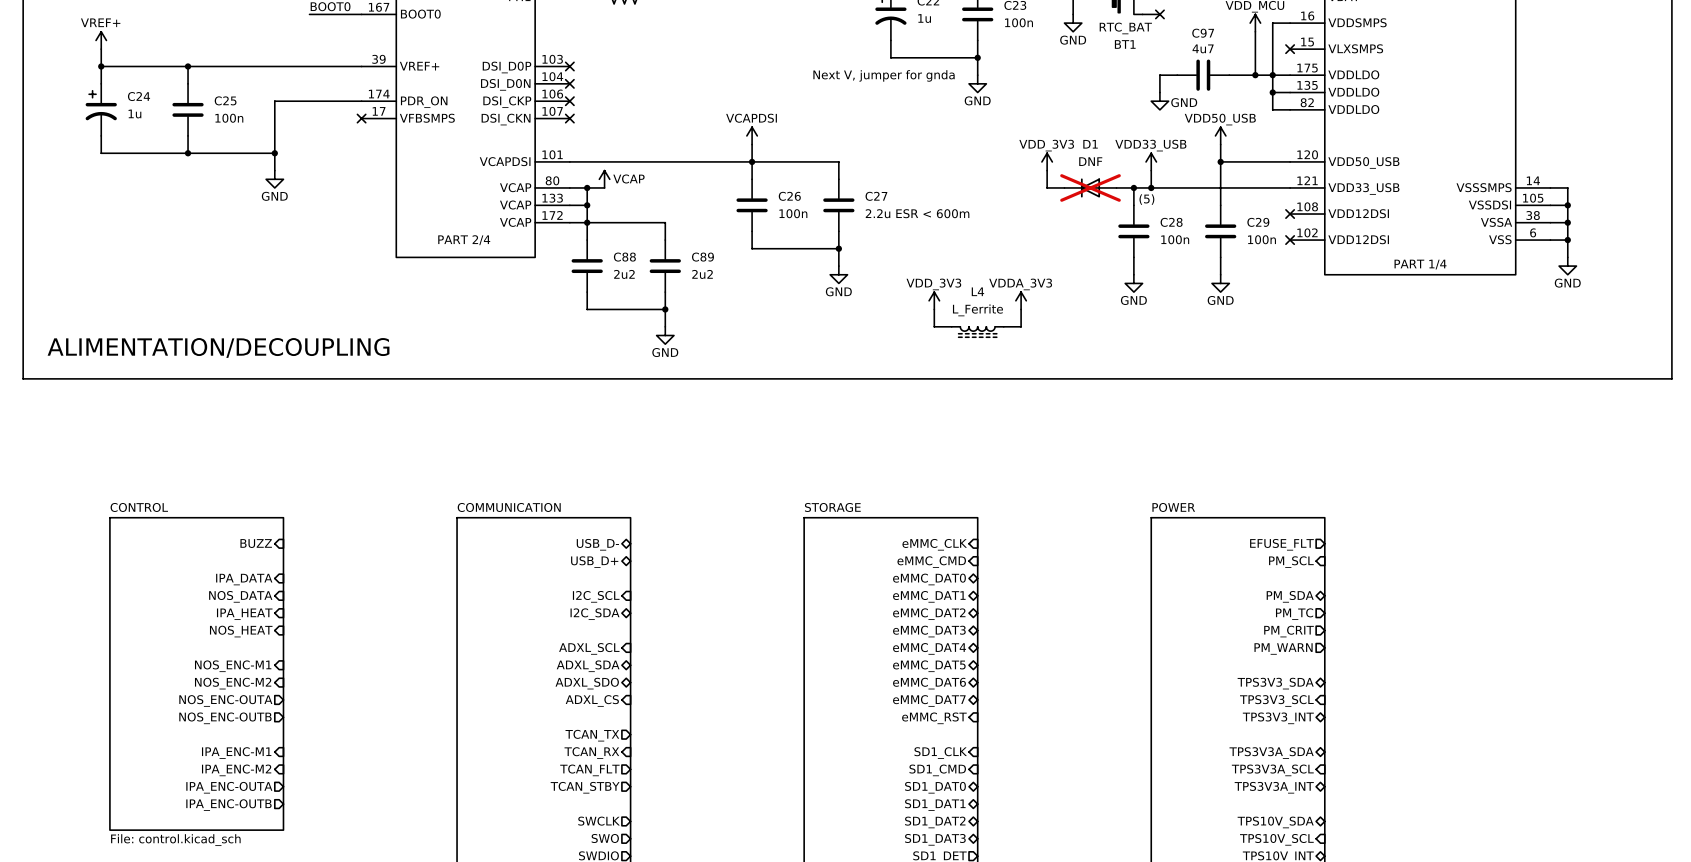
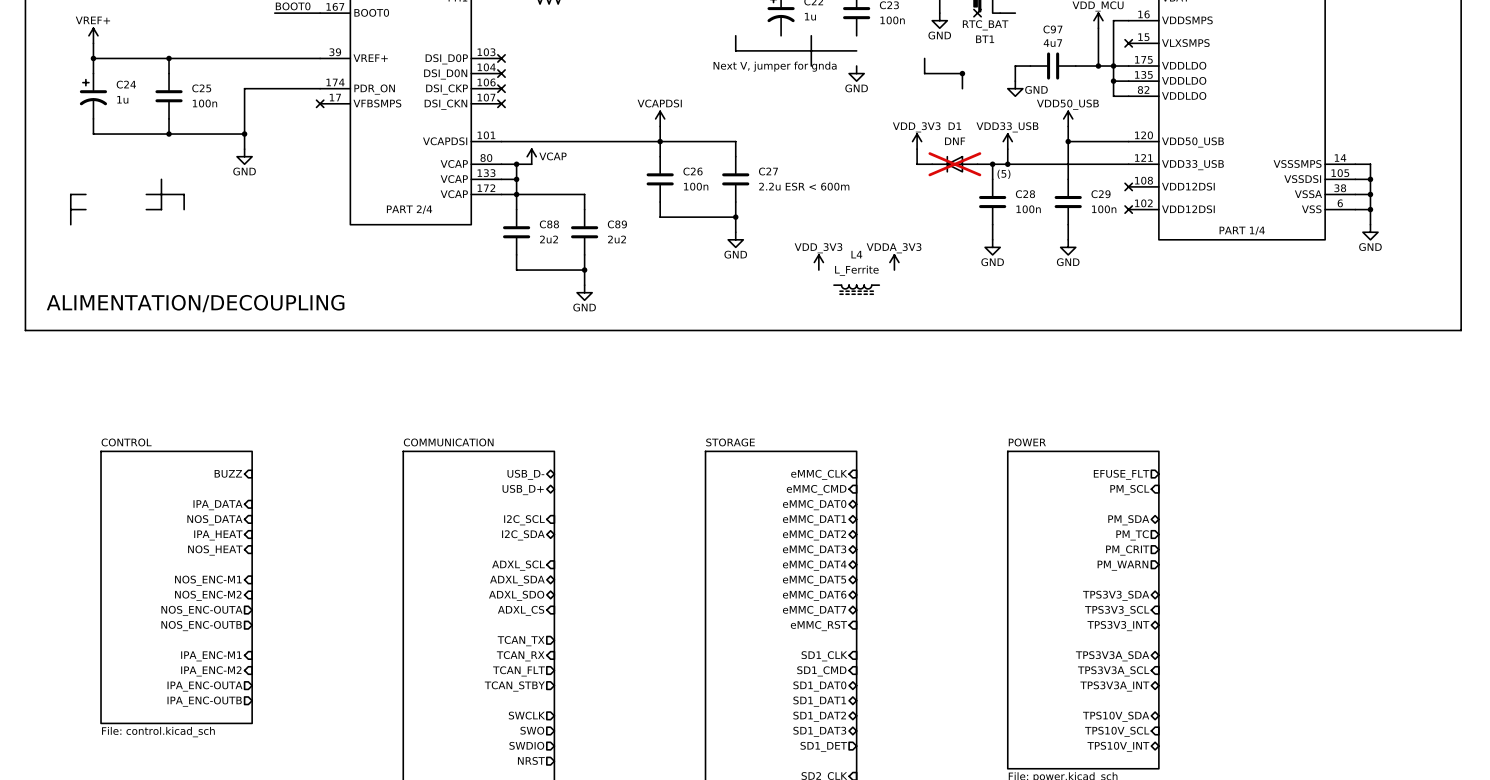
no-connect mark: none -> (977, 13)
no-connect mark: (1159, 14) -> none
wire: (890, 40) (890, 57) -> (735, 35) (735, 50) (781, 50)
wire: (977, 40) (977, 75) -> (811, 35) (811, 66)
junction: (977, 57) -> none
wire: none -> (924, 58) (924, 73) (962, 73) (962, 88)
junction: none -> (962, 73)
wire: none -> (161, 179) (161, 209) (146, 209)
wire: none -> (85, 194) (70, 194) (70, 224)
wire: none -> (146, 194) (184, 194) (184, 209)
wire: none -> (70, 209) (85, 209)
wire: (934, 309) (934, 326) (951, 326) -> none
wire: (1021, 309) (1021, 326) (1003, 326) -> none

